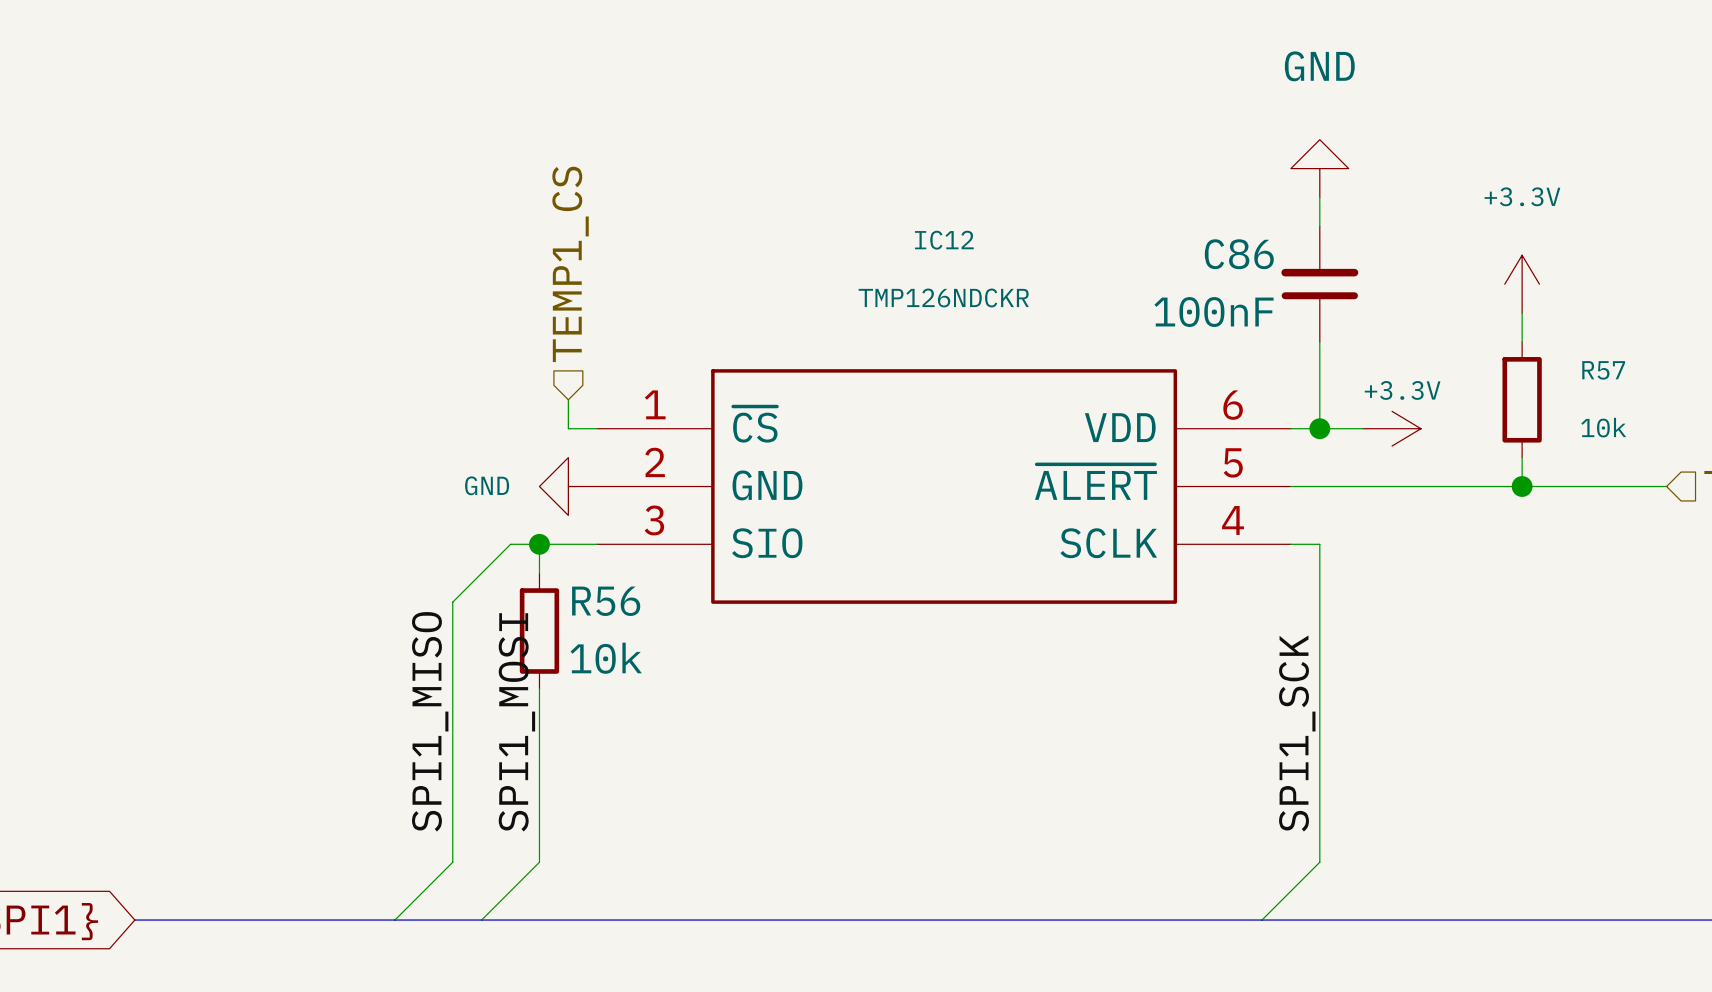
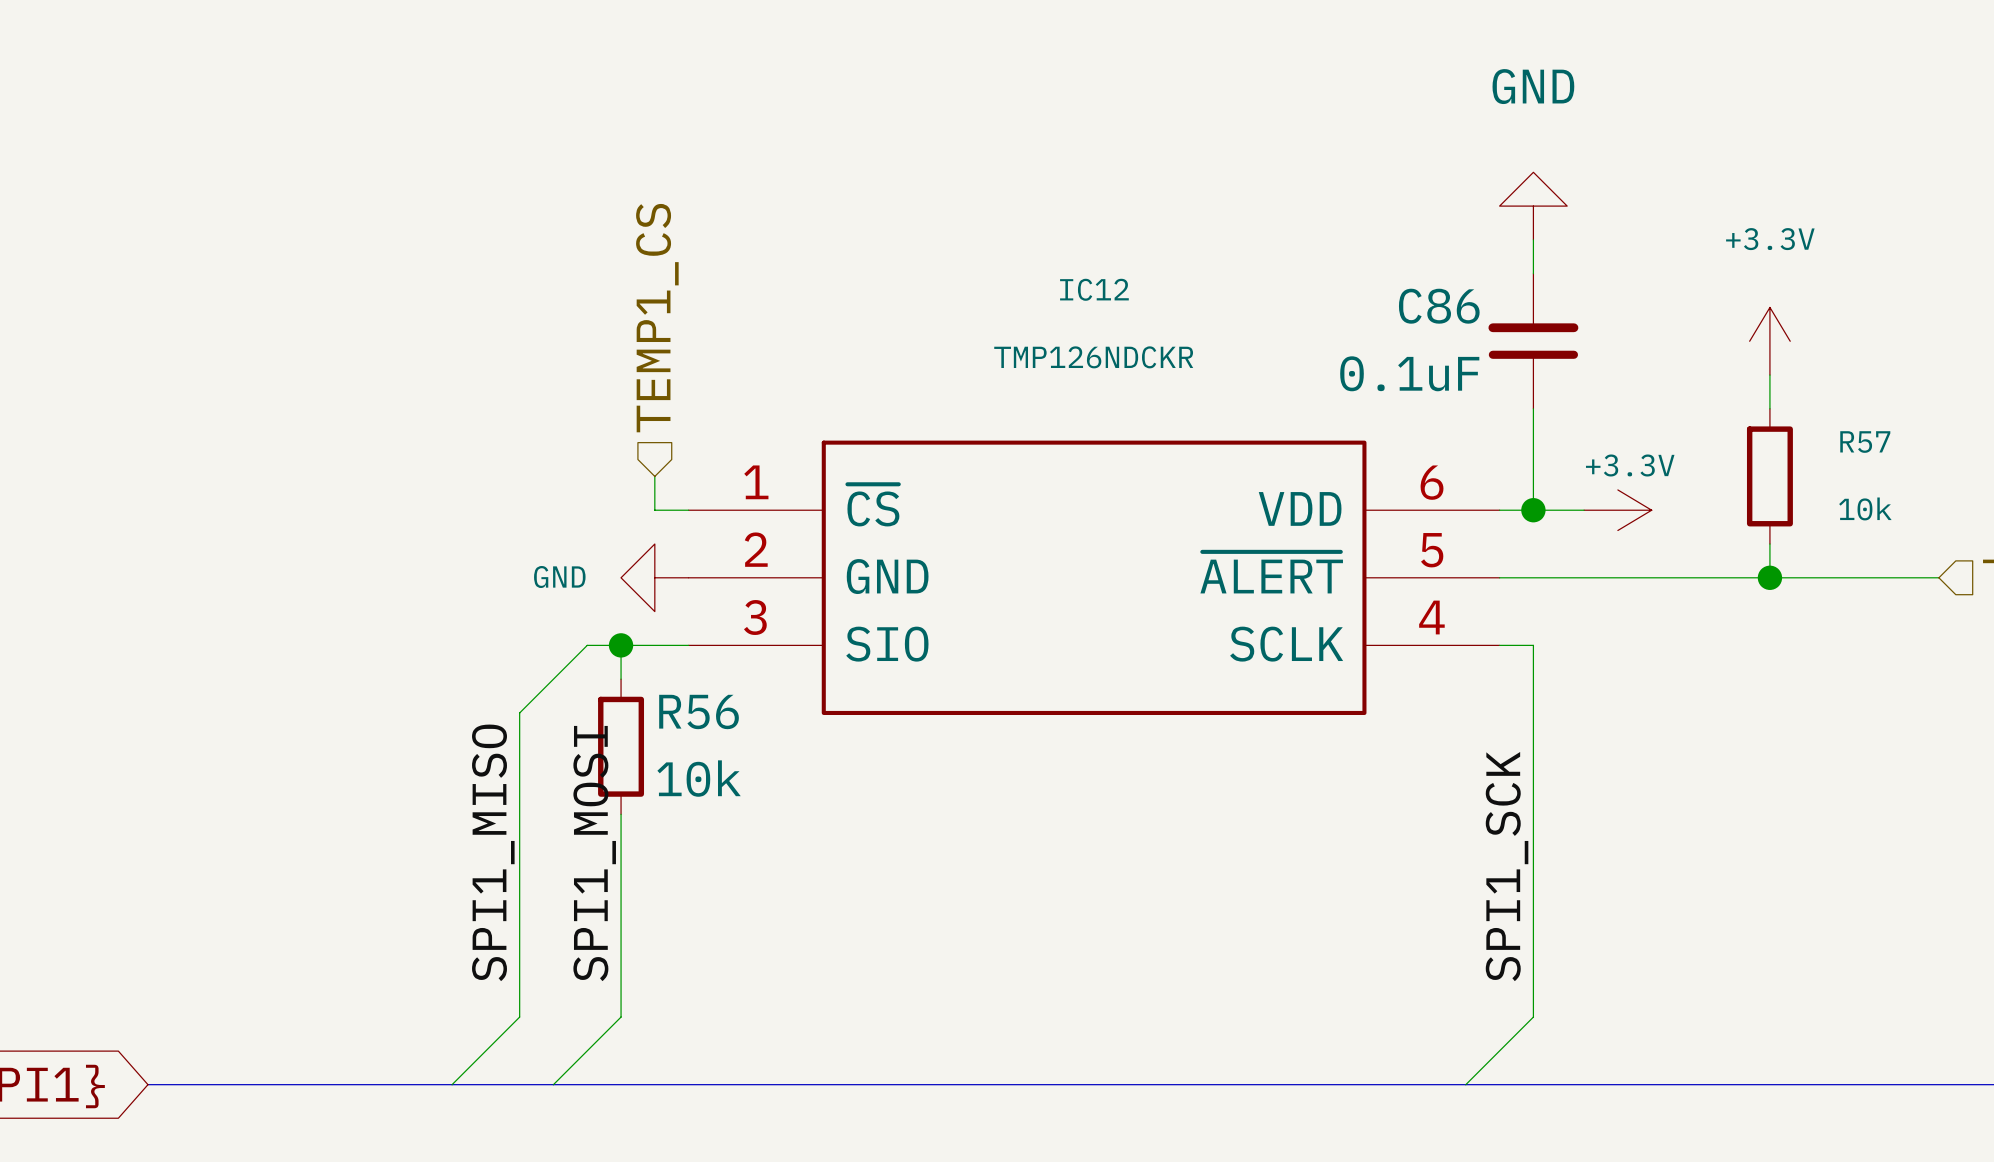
C86 value: 100nF (1213, 312) -> 0.1uF (1409, 373)

